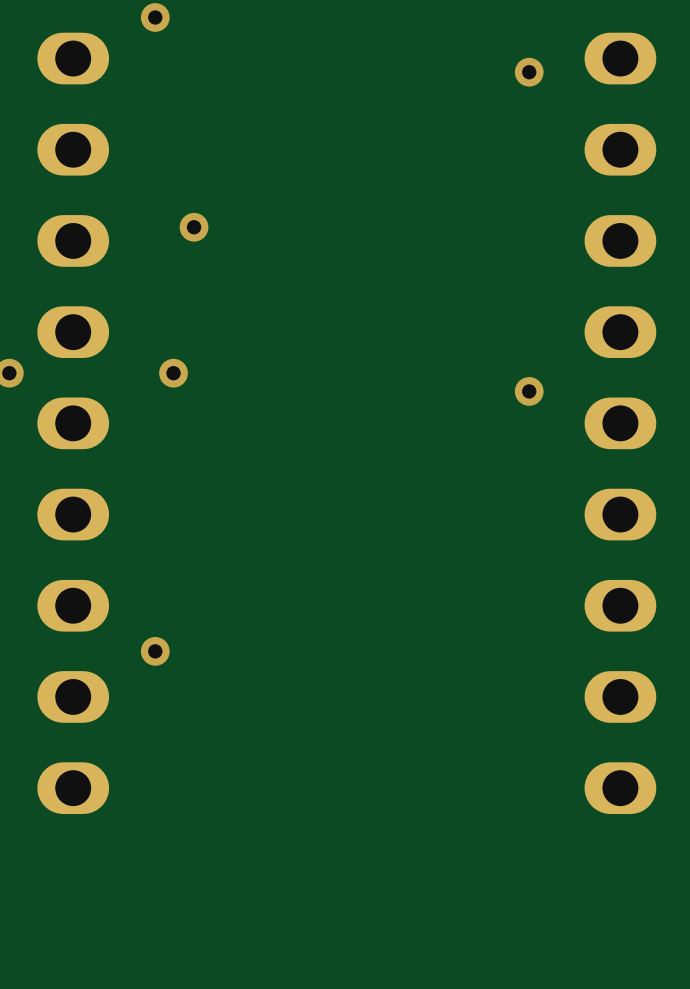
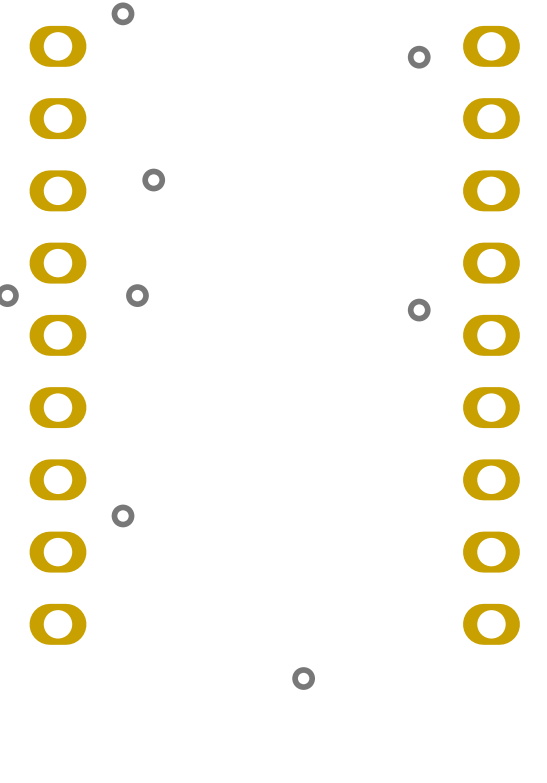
via: none -> (303, 678)

